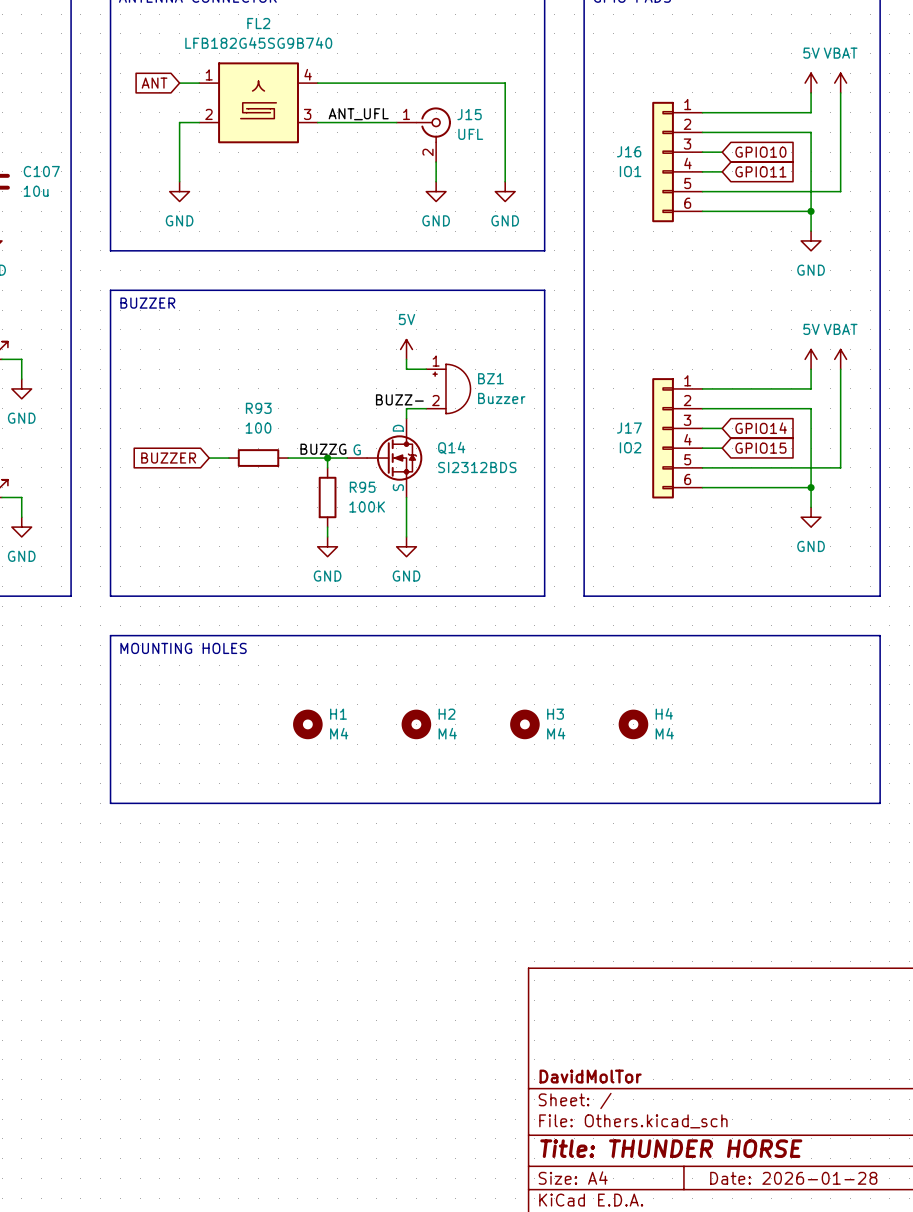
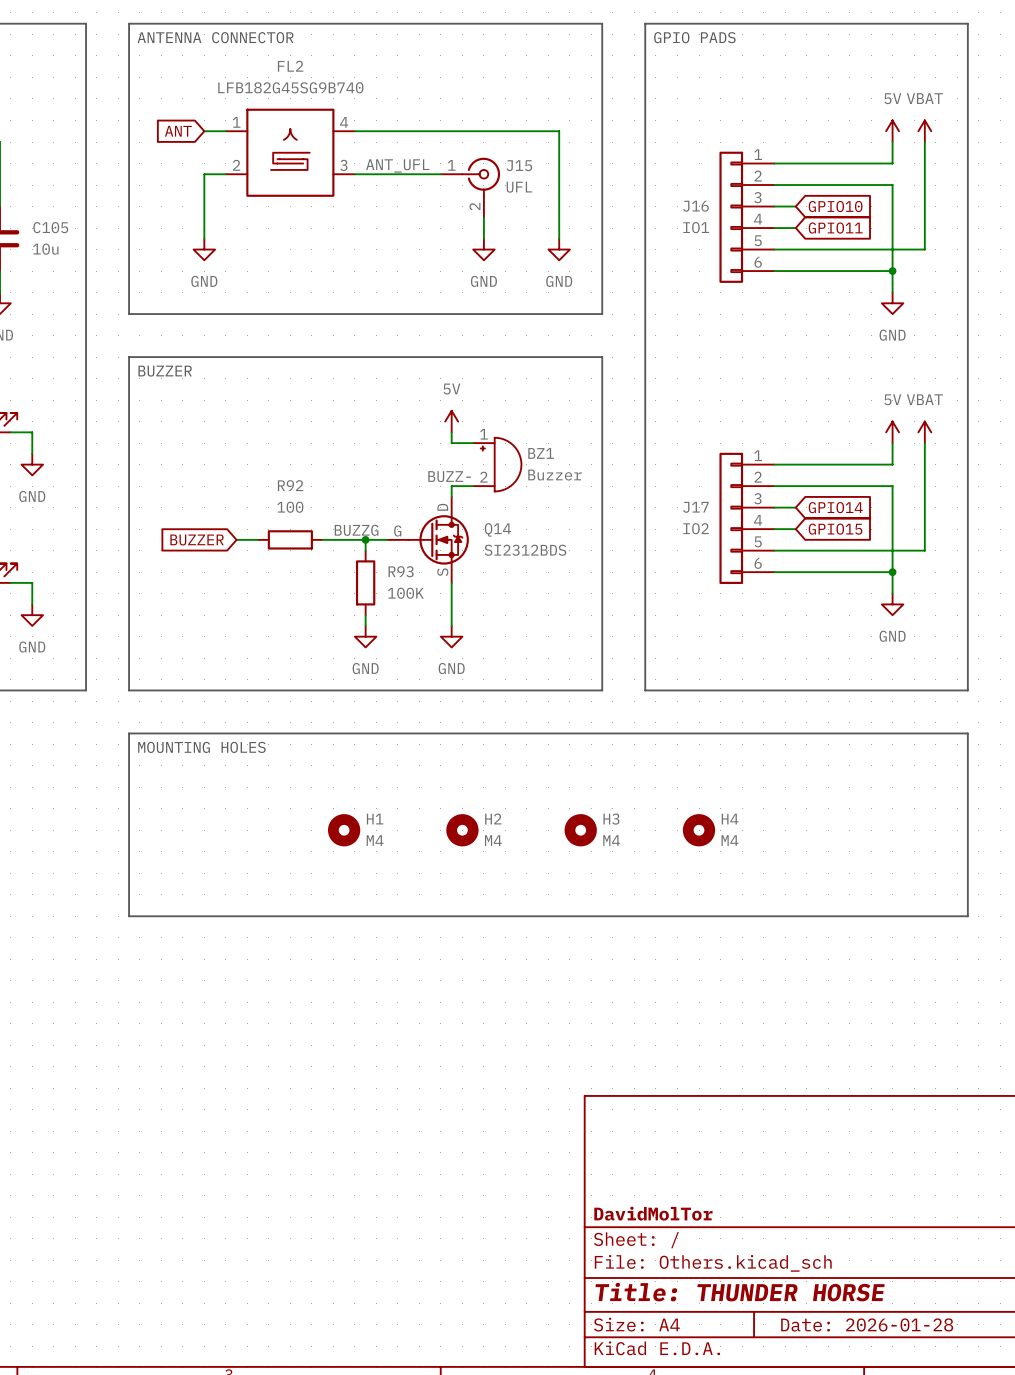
C107 name: C107 (41, 171) -> C105 (50, 227)
R93 name: R93 (258, 408) -> R92 (290, 485)
R95 name: R95 (362, 487) -> R93 (401, 571)

